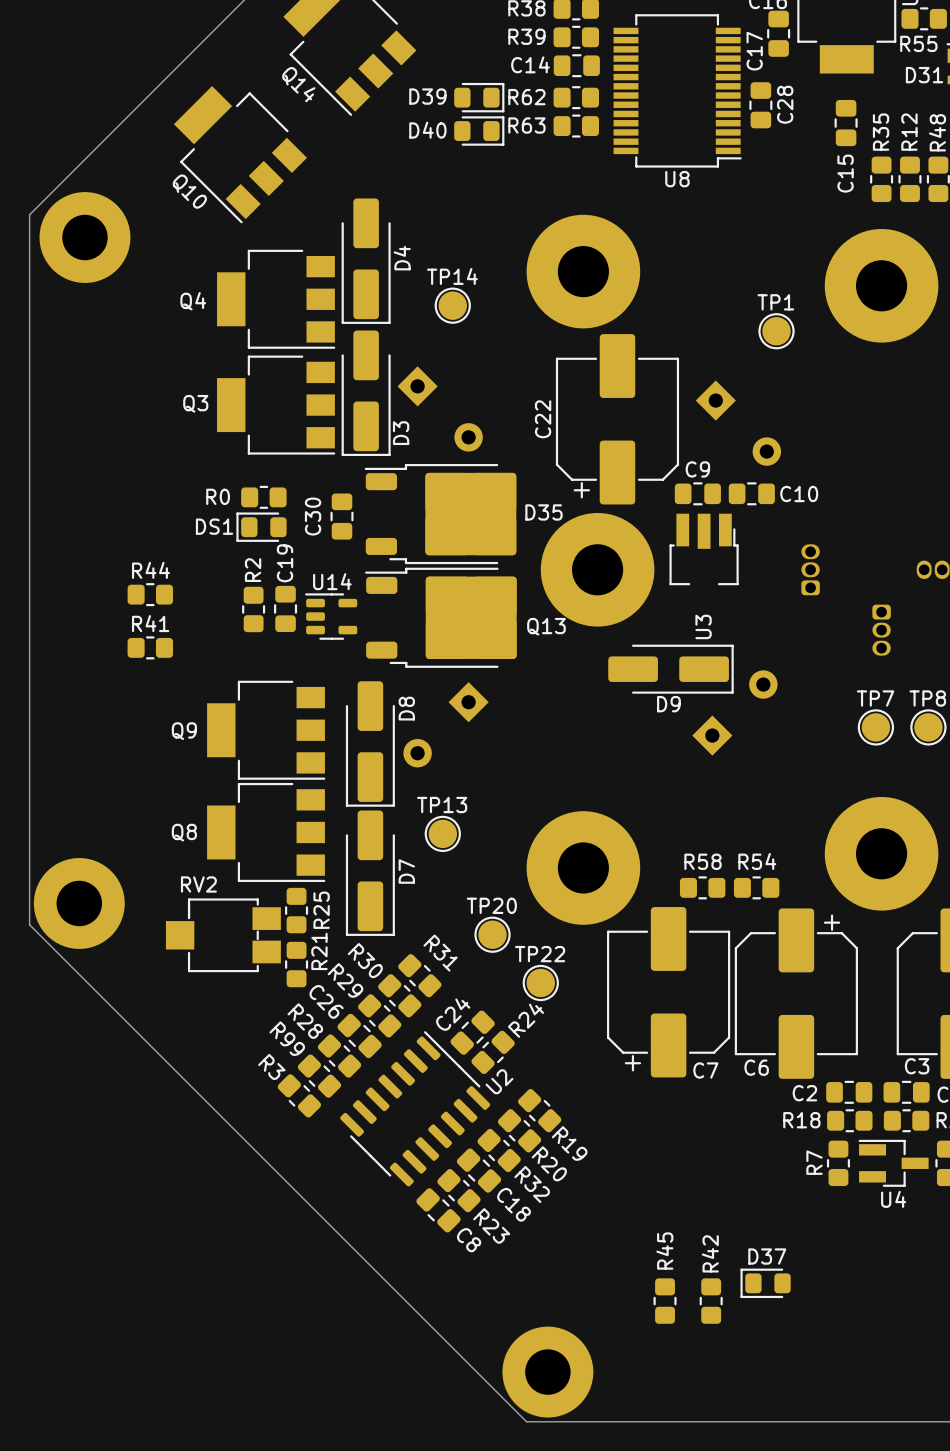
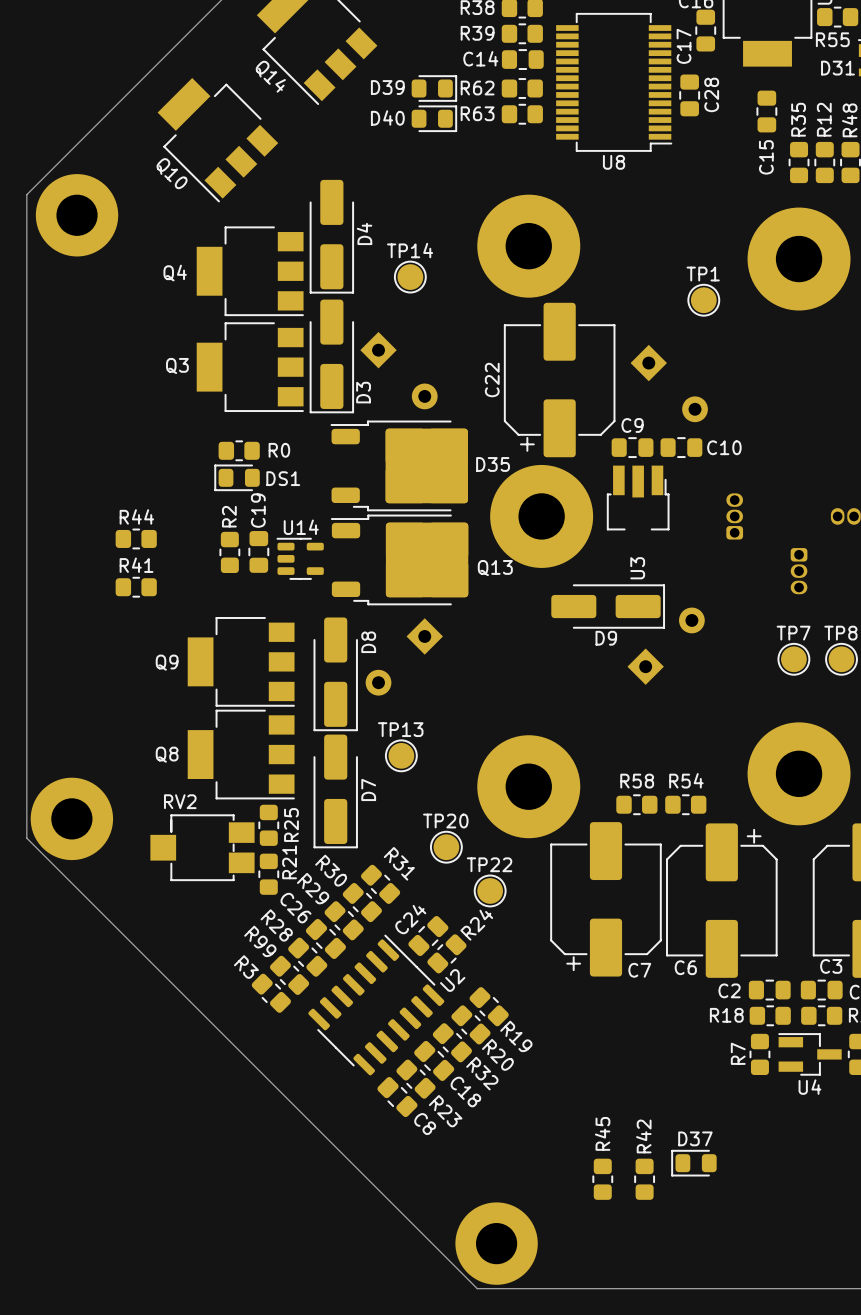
R0 name position: R0 (218, 496) -> R0 (279, 450)
C30: (341, 516) -> none
DS1 name position: DS1 (214, 526) -> DS1 (283, 478)

